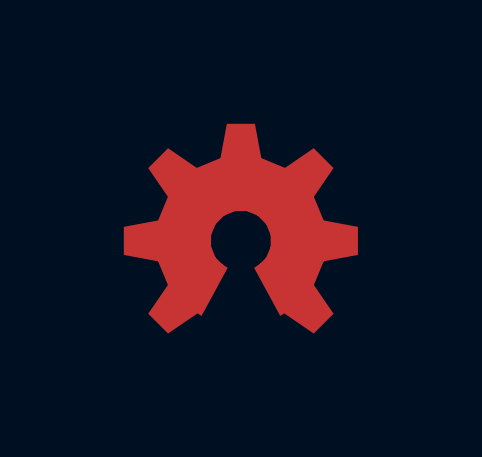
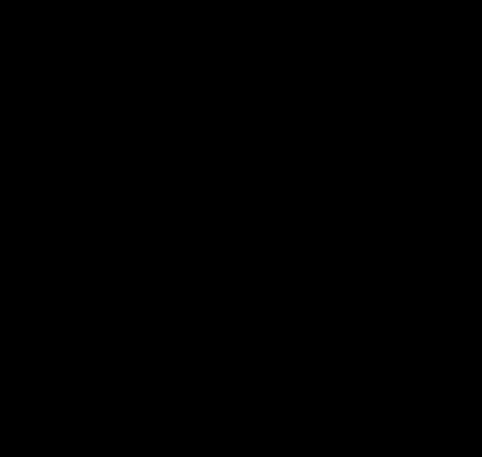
part: (240, 228) -> none

